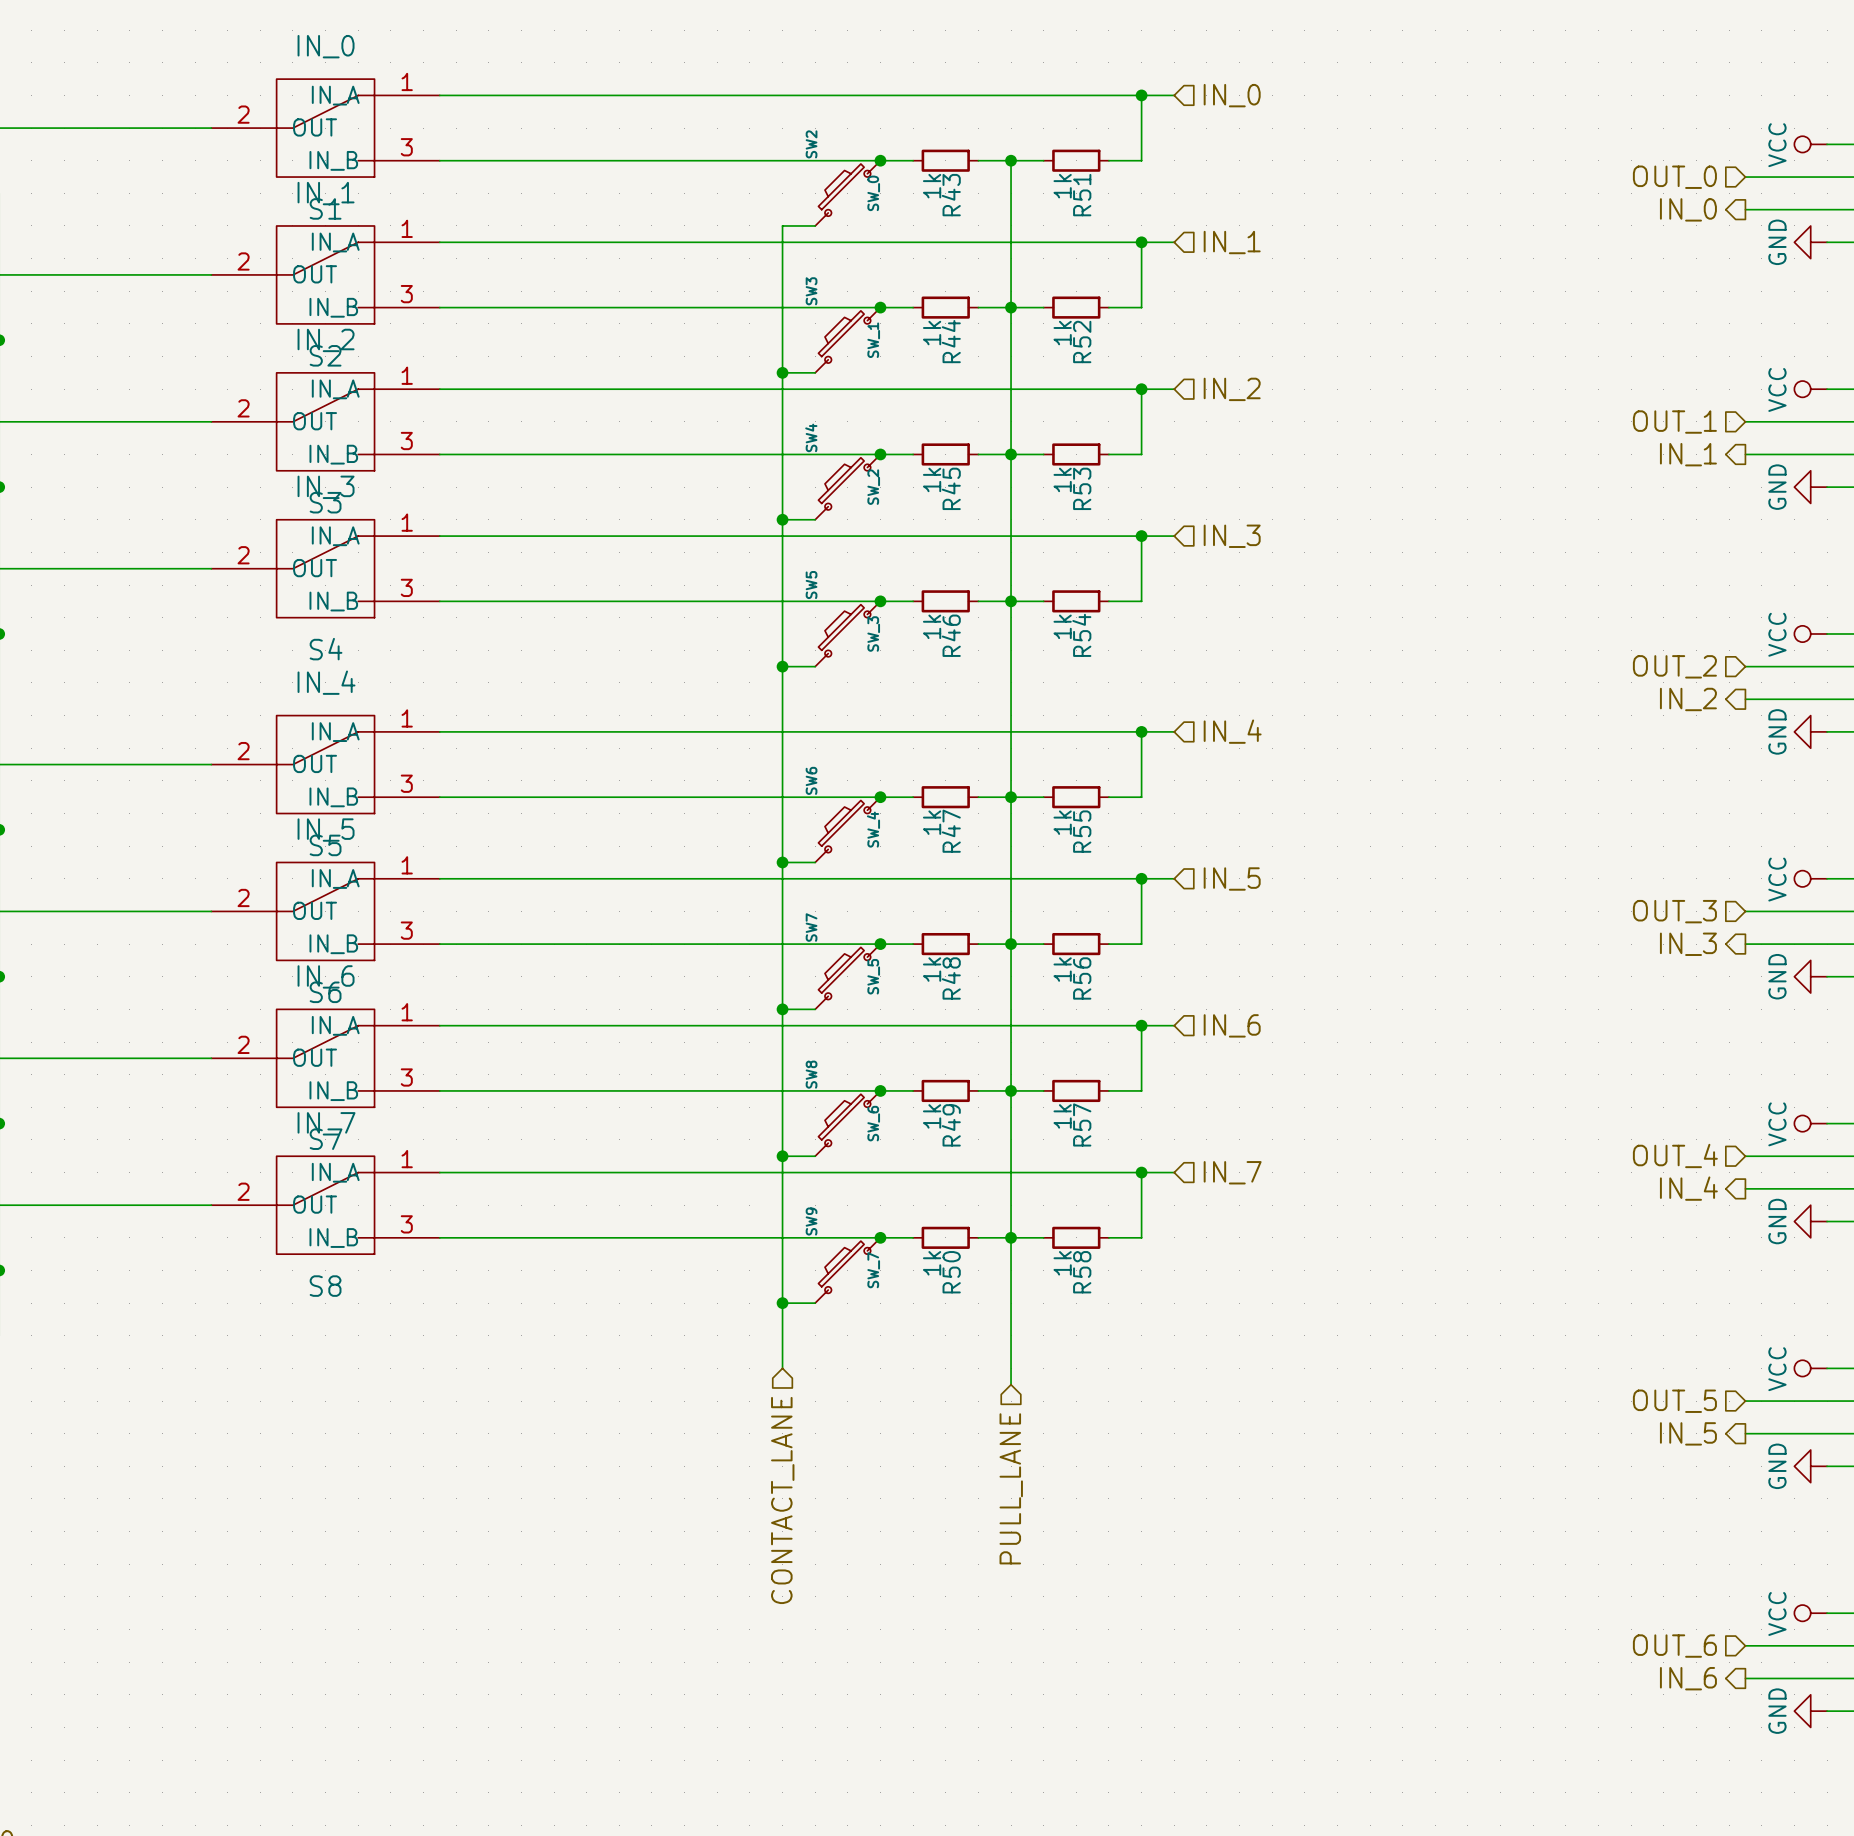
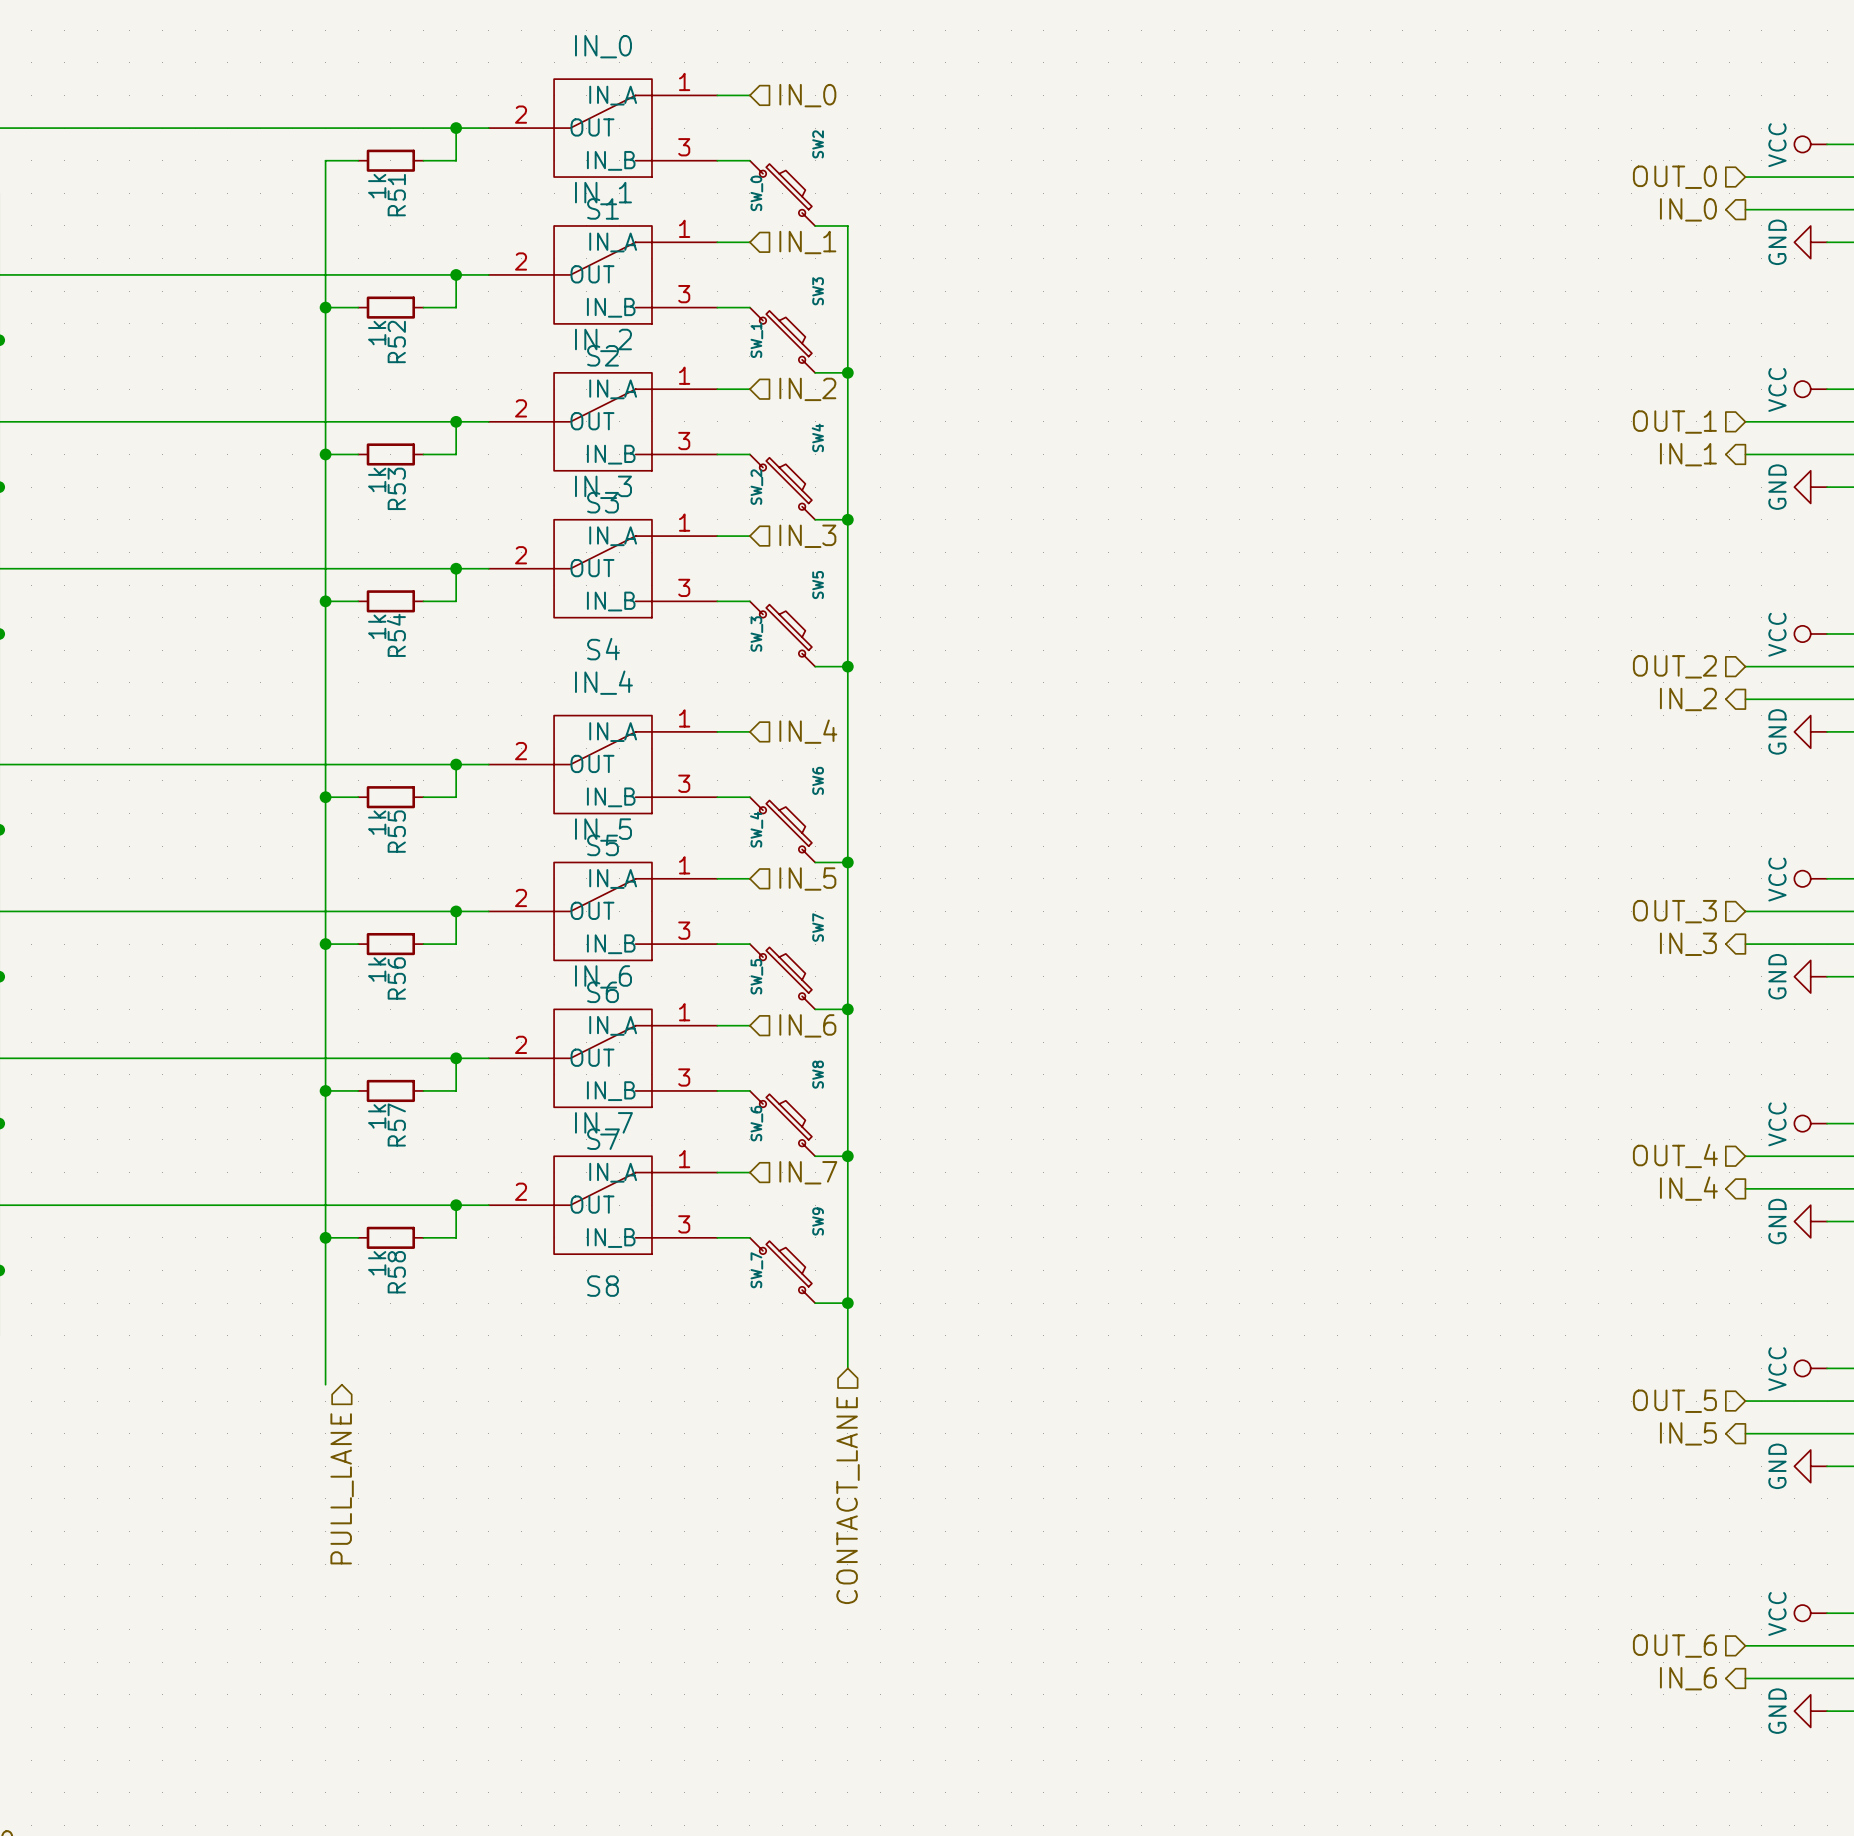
wire: (439, 95) (717, 95) -> (211, 128) (488, 128)
wire: (749, 95) (1174, 95) -> none
hierarchical label: none -> IN_0 (807, 95)
wire: (1141, 95) (1141, 160) (1108, 160) -> none
junction: (1141, 95) -> none
hierarchical label: IN_0 (1232, 95) -> none
S1 position: (325, 128) -> (603, 128)
junction: none -> (456, 128)
wire: none -> (358, 160) (325, 160) (325, 1384)
wire: (456, 160) (717, 160) -> (456, 160) (456, 128)
wire: (749, 160) (913, 160) -> none
junction: (880, 160) -> none
R43: 1k (945, 160) -> none
wire: (978, 160) (1043, 160) -> none
wire: (1011, 160) (1011, 1384) -> none
junction: (1011, 160) -> none
R51 position: (1076, 160) -> (390, 160)
SW2 flip: as is (847, 193) -> left-right (782, 193)
SW2 position: (847, 193) -> (782, 193)
wire: (815, 225) (782, 225) (782, 1368) -> (815, 225) (847, 225) (847, 1368)
wire: (439, 242) (717, 242) -> (211, 274) (488, 274)
wire: (749, 242) (1174, 242) -> none
hierarchical label: none -> IN_1 (807, 242)
wire: (1141, 242) (1141, 307) (1108, 307) -> none
junction: (1141, 242) -> none
hierarchical label: IN_1 (1232, 242) -> none
S2 position: (325, 274) -> (603, 274)
junction: none -> (456, 274)
wire: none -> (325, 307) (358, 307)
junction: none -> (325, 307)
wire: (456, 307) (717, 307) -> (456, 307) (456, 274)
wire: (749, 307) (913, 307) -> none
junction: (880, 307) -> none
R44: 1k (945, 307) -> none
wire: (978, 307) (1043, 307) -> none
junction: (1011, 307) -> none
R52 position: (1076, 307) -> (390, 307)
SW3 flip: as is (847, 340) -> left-right (782, 340)
SW3 position: (847, 340) -> (782, 340)
wire: (782, 372) (815, 372) -> (847, 372) (815, 372)
junction: (782, 372) -> none
junction: none -> (847, 372)
wire: (439, 389) (717, 389) -> (211, 421) (488, 421)
wire: (749, 389) (1174, 389) -> none
hierarchical label: none -> IN_2 (807, 389)
wire: (1141, 389) (1141, 454) (1108, 454) -> none
junction: (1141, 389) -> none
hierarchical label: IN_2 (1232, 389) -> none
S3 position: (325, 421) -> (603, 421)
junction: none -> (456, 421)
wire: none -> (325, 454) (358, 454)
junction: none -> (325, 454)
wire: (456, 454) (717, 454) -> (456, 454) (456, 421)
wire: (749, 454) (913, 454) -> none
junction: (880, 454) -> none
R45: 1k (945, 454) -> none
wire: (978, 454) (1043, 454) -> none
junction: (1011, 454) -> none
R53 position: (1076, 454) -> (390, 454)
SW4 flip: as is (847, 487) -> left-right (782, 487)
SW4 position: (847, 487) -> (782, 487)
wire: (782, 519) (815, 519) -> (847, 519) (815, 519)
junction: (782, 519) -> none
junction: none -> (847, 519)
wire: (439, 536) (717, 536) -> (211, 568) (488, 568)
wire: (749, 536) (1174, 536) -> none
hierarchical label: none -> IN_3 (807, 536)
wire: (1141, 536) (1141, 601) (1108, 601) -> none
junction: (1141, 536) -> none
hierarchical label: IN_3 (1232, 536) -> none
S4 position: (325, 568) -> (603, 568)
junction: none -> (456, 568)
wire: none -> (325, 601) (358, 601)
junction: none -> (325, 601)
wire: (456, 601) (717, 601) -> (456, 601) (456, 568)
wire: (749, 601) (913, 601) -> none
junction: (880, 601) -> none
R46: 1k (945, 601) -> none
wire: (978, 601) (1043, 601) -> none
junction: (1011, 601) -> none
R54 position: (1076, 601) -> (390, 601)
SW5 flip: as is (847, 633) -> left-right (782, 633)
SW5 position: (847, 633) -> (782, 633)
wire: (782, 666) (815, 666) -> (847, 666) (815, 666)
junction: (782, 666) -> none
junction: none -> (847, 666)
wire: (439, 731) (717, 731) -> (211, 764) (488, 764)
wire: (749, 731) (1174, 731) -> none
hierarchical label: none -> IN_4 (808, 731)
wire: (1141, 731) (1141, 797) (1108, 797) -> none
junction: (1141, 731) -> none
hierarchical label: IN_4 (1232, 731) -> none
S5 position: (325, 764) -> (603, 764)
junction: none -> (456, 764)
wire: none -> (325, 797) (358, 797)
junction: none -> (325, 797)
wire: (456, 797) (717, 797) -> (456, 797) (456, 764)
wire: (749, 797) (913, 797) -> none
junction: (880, 797) -> none
R47: 1k (945, 797) -> none
wire: (978, 797) (1043, 797) -> none
junction: (1011, 797) -> none
R55 position: (1076, 797) -> (390, 797)
SW6 flip: as is (847, 829) -> left-right (782, 829)
SW6 position: (847, 829) -> (782, 829)
wire: (782, 862) (815, 862) -> (847, 862) (815, 862)
junction: (782, 862) -> none
junction: none -> (847, 862)
wire: (439, 878) (717, 878) -> (211, 911) (488, 911)
wire: (749, 878) (1174, 878) -> none
wire: (1141, 878) (1141, 944) (1108, 944) -> none
junction: (1141, 878) -> none
hierarchical label: none -> IN_5 (807, 879)
hierarchical label: IN_5 (1232, 879) -> none
S6 position: (325, 911) -> (603, 911)
junction: none -> (456, 911)
wire: none -> (325, 944) (358, 944)
junction: none -> (325, 944)
wire: (456, 944) (717, 944) -> (456, 944) (456, 911)
wire: (749, 944) (913, 944) -> none
junction: (880, 944) -> none
R48: 1k (945, 944) -> none
wire: (978, 944) (1043, 944) -> none
junction: (1011, 944) -> none
R56 position: (1076, 944) -> (390, 944)
SW7 flip: as is (847, 976) -> left-right (782, 976)
SW7 position: (847, 976) -> (782, 976)
wire: (782, 1009) (815, 1009) -> (847, 1009) (815, 1009)
junction: (782, 1009) -> none
junction: none -> (847, 1009)
wire: (439, 1025) (717, 1025) -> (211, 1058) (488, 1058)
wire: (749, 1025) (1174, 1025) -> none
hierarchical label: none -> IN_6 (807, 1025)
wire: (1141, 1025) (1141, 1090) (1108, 1090) -> none
junction: (1141, 1025) -> none
hierarchical label: IN_6 (1232, 1025) -> none
S7 position: (325, 1058) -> (603, 1058)
junction: none -> (456, 1058)
wire: none -> (325, 1090) (358, 1090)
junction: none -> (325, 1090)
wire: (456, 1090) (717, 1090) -> (456, 1090) (456, 1058)
wire: (749, 1090) (913, 1090) -> none
junction: (880, 1090) -> none
R49: 1k (945, 1090) -> none
wire: (978, 1090) (1043, 1090) -> none
junction: (1011, 1090) -> none
R57 position: (1076, 1090) -> (390, 1090)
SW8 flip: as is (847, 1123) -> left-right (782, 1123)
SW8 position: (847, 1123) -> (782, 1123)
wire: (782, 1156) (815, 1156) -> (847, 1156) (815, 1156)
junction: (782, 1156) -> none
junction: none -> (847, 1156)
wire: (439, 1172) (717, 1172) -> (211, 1205) (488, 1205)
wire: (749, 1172) (1174, 1172) -> none
hierarchical label: none -> IN_7 (808, 1172)
wire: (1141, 1172) (1141, 1237) (1108, 1237) -> none
junction: (1141, 1172) -> none
hierarchical label: IN_7 (1232, 1172) -> none
S8 position: (325, 1205) -> (603, 1205)
junction: none -> (456, 1205)
wire: none -> (325, 1237) (358, 1237)
junction: none -> (325, 1237)
wire: (456, 1237) (717, 1237) -> (456, 1237) (456, 1205)
wire: (749, 1237) (913, 1237) -> none
junction: (880, 1237) -> none
R50: 1k (945, 1237) -> none
wire: (978, 1237) (1043, 1237) -> none
junction: (1011, 1237) -> none
R58 position: (1076, 1237) -> (390, 1237)
SW9 flip: as is (847, 1270) -> left-right (782, 1270)
SW9 position: (847, 1270) -> (782, 1270)
wire: (782, 1303) (815, 1303) -> (847, 1303) (815, 1303)
junction: (782, 1303) -> none
junction: none -> (847, 1303)
hierarchical label: none -> PULL_LANE (342, 1488)
hierarchical label: PULL_LANE (1011, 1488) -> none
hierarchical label position: CONTACT_LANE (782, 1500) -> CONTACT_LANE (848, 1500)

